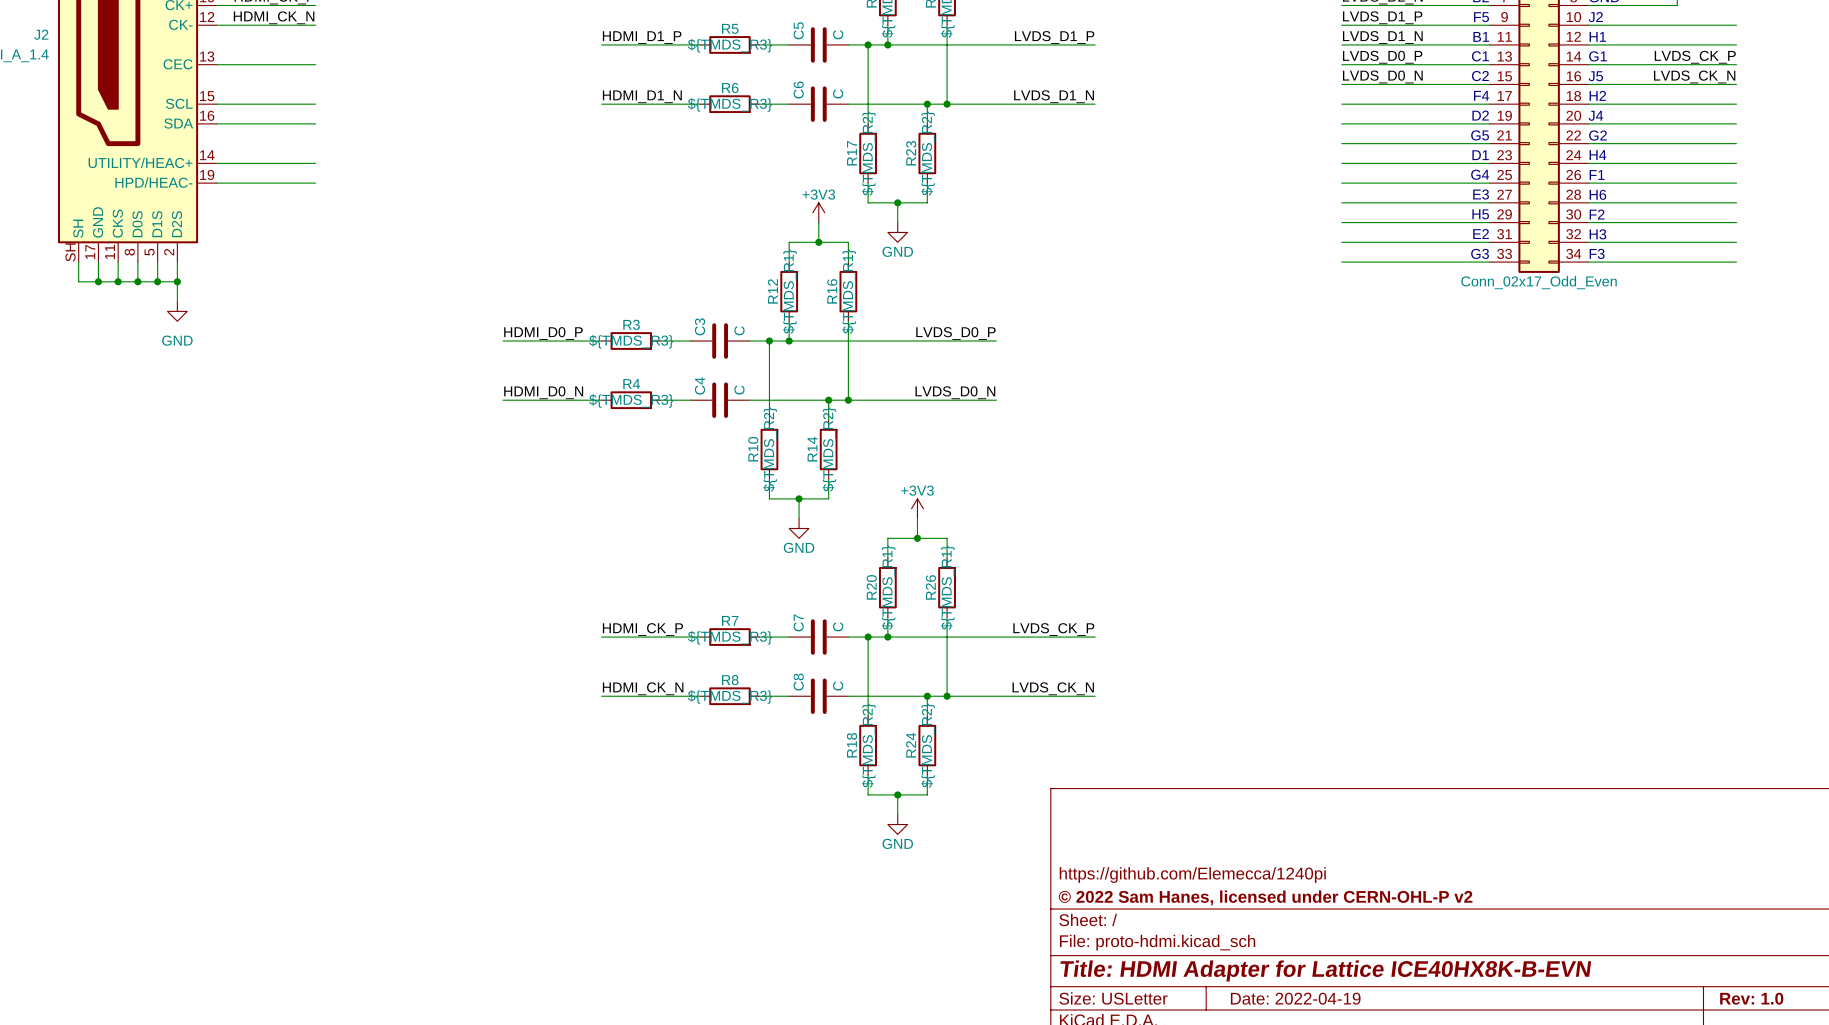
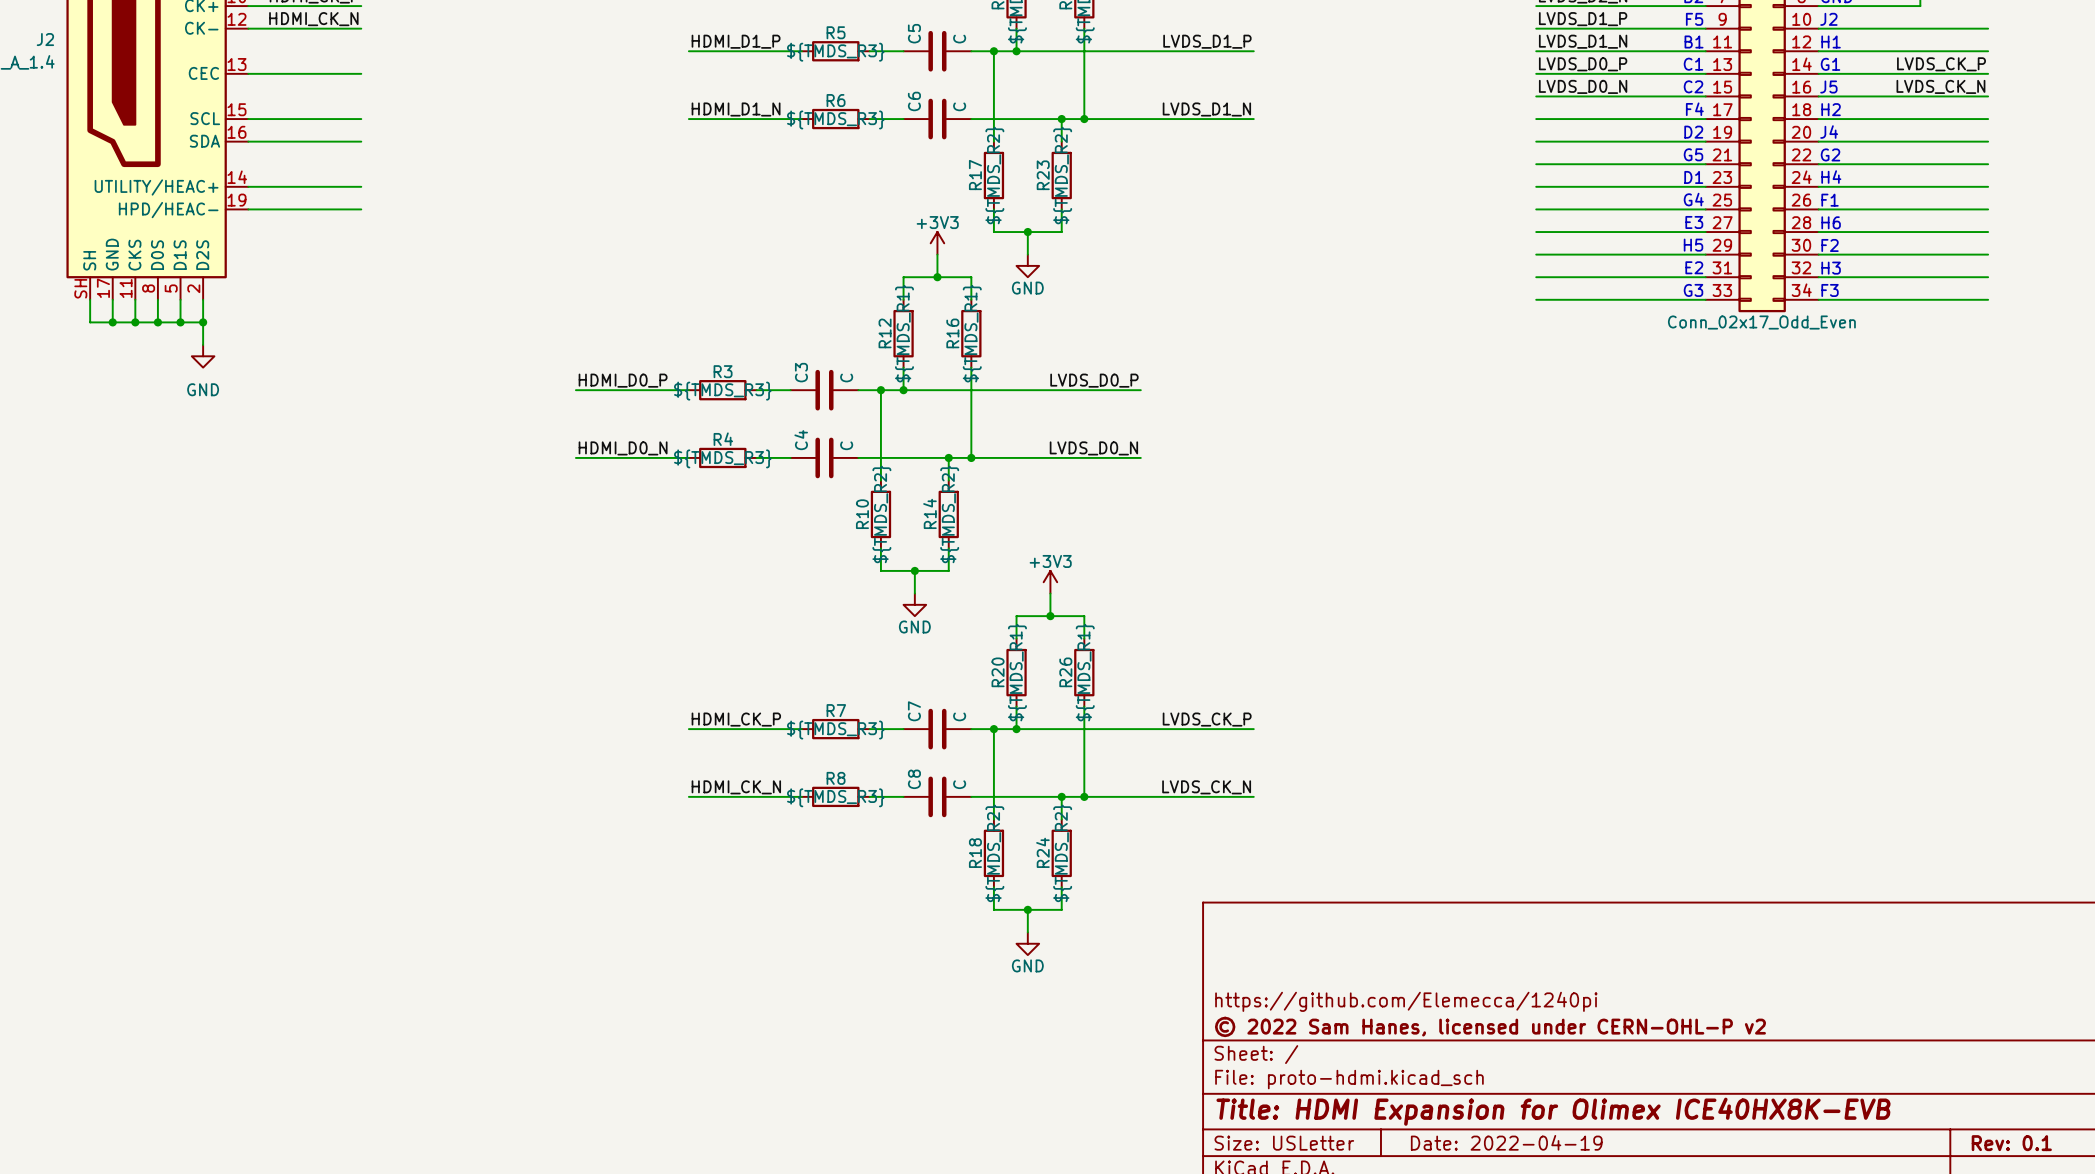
title block: Title: HDMI Adapter for Lattice ICE40HX8K-B-EVN (1325, 970) -> Title: HDMI Expansion for Olimex ICE40HX8K-EVB (1553, 1111)
title block: Rev: 1.0 (1751, 998) -> Rev: 0.1 (2011, 1143)

